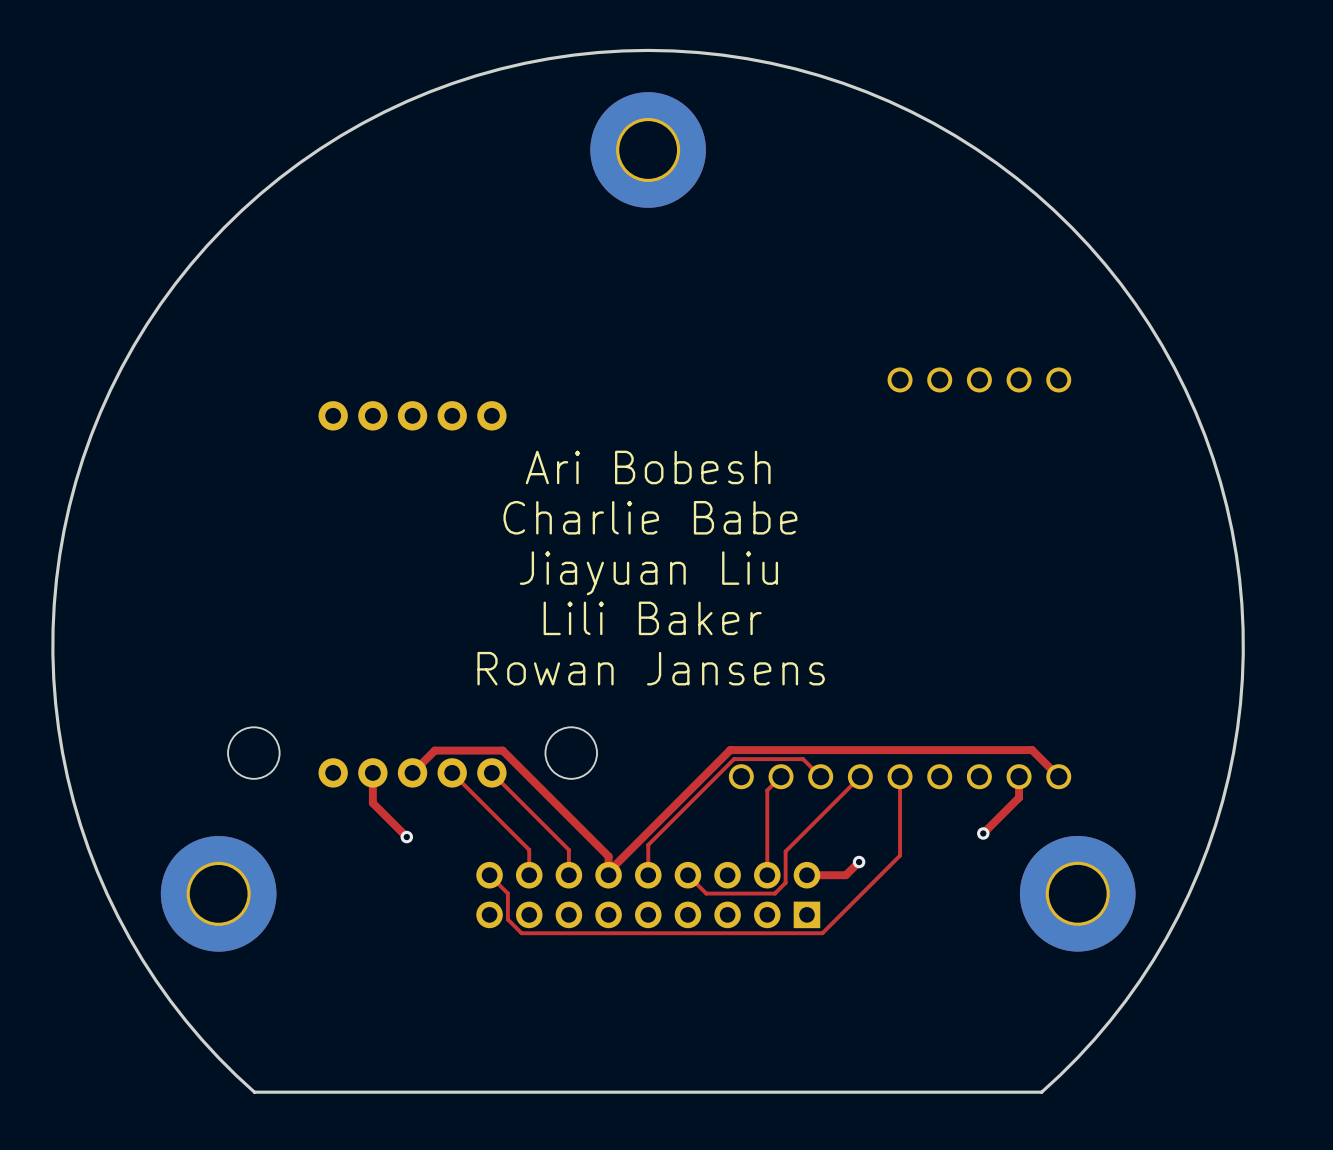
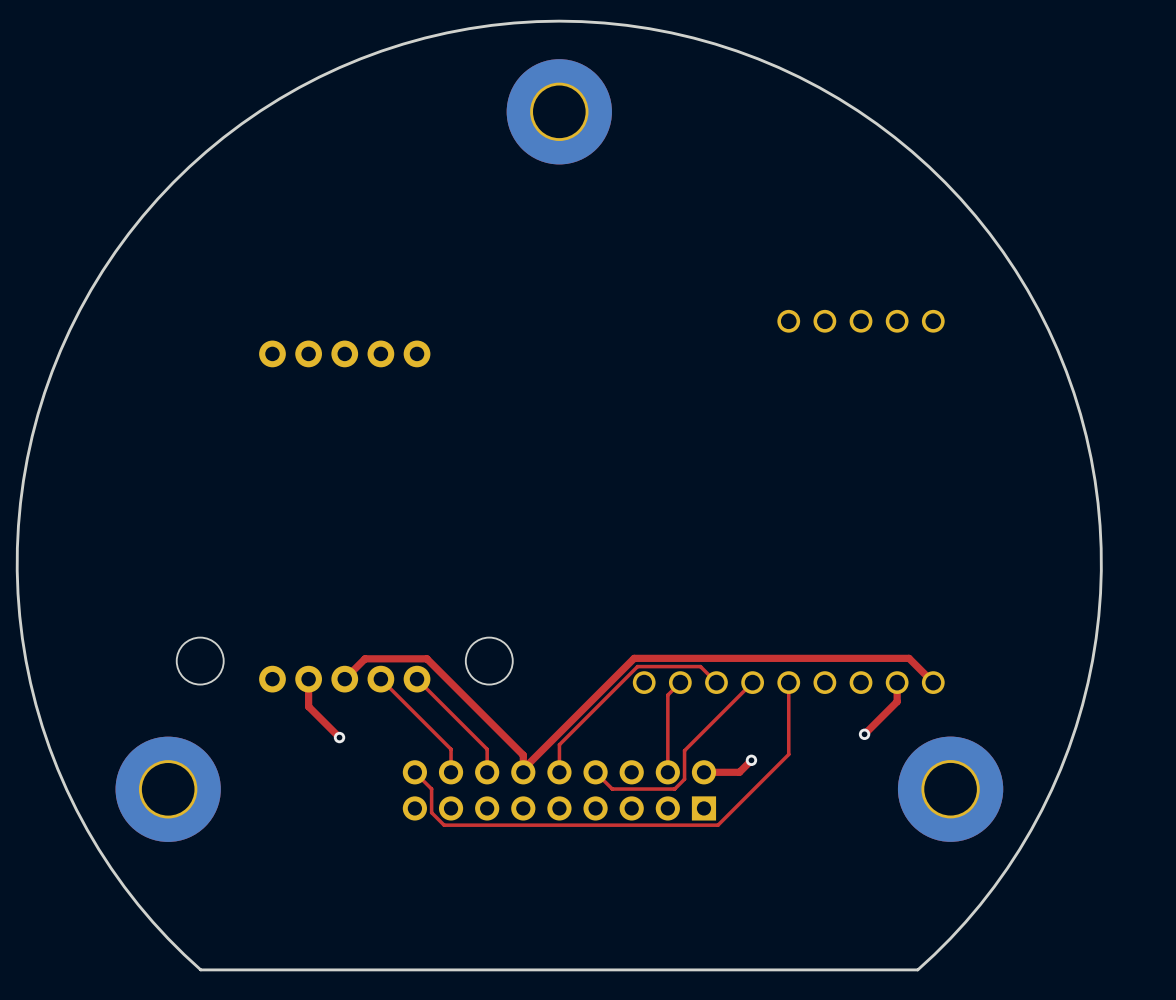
text: Ari Bobesh (648, 467) -> none
text: Charlie Babe (650, 517) -> none
text: Jiayuan Liu (648, 573) -> none
text: Lili Baker (652, 618) -> none
text: Rowan Jansens (651, 668) -> none

